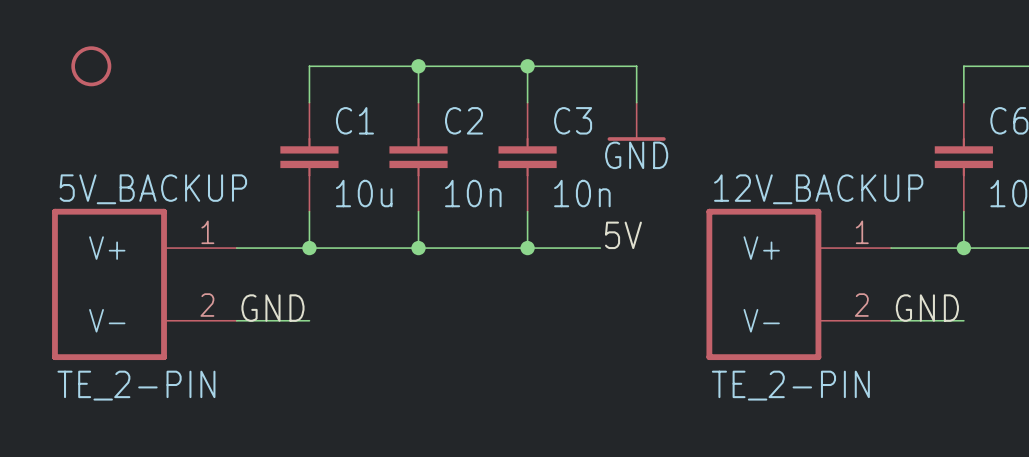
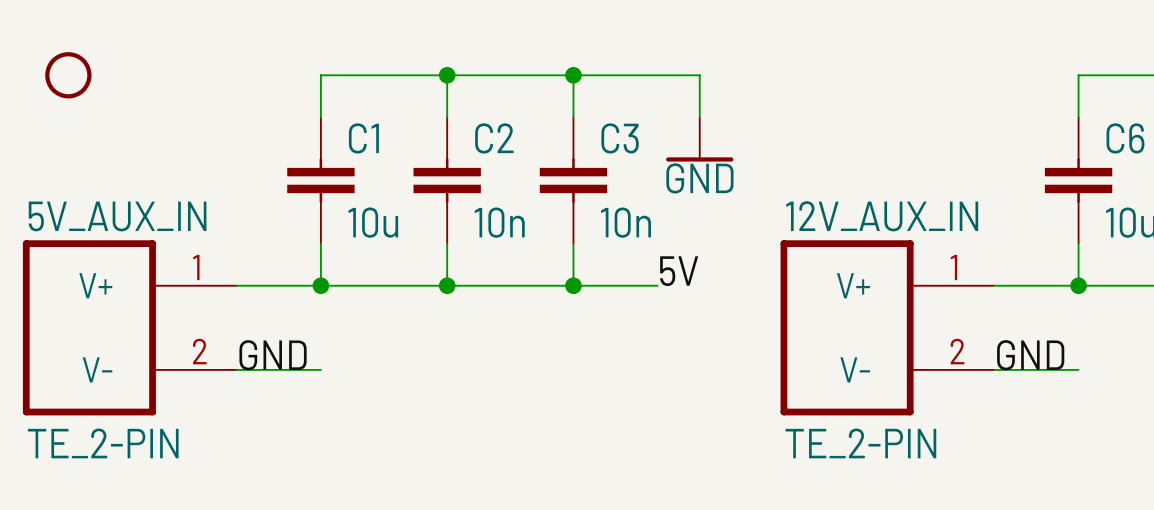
5V_BACKUP name: 5V_BACKUP (153, 189) -> 5V_AUX_IN (117, 216)
12V_BACKUP name: 12V_BACKUP (818, 189) -> 12V_AUX_IN (882, 216)

